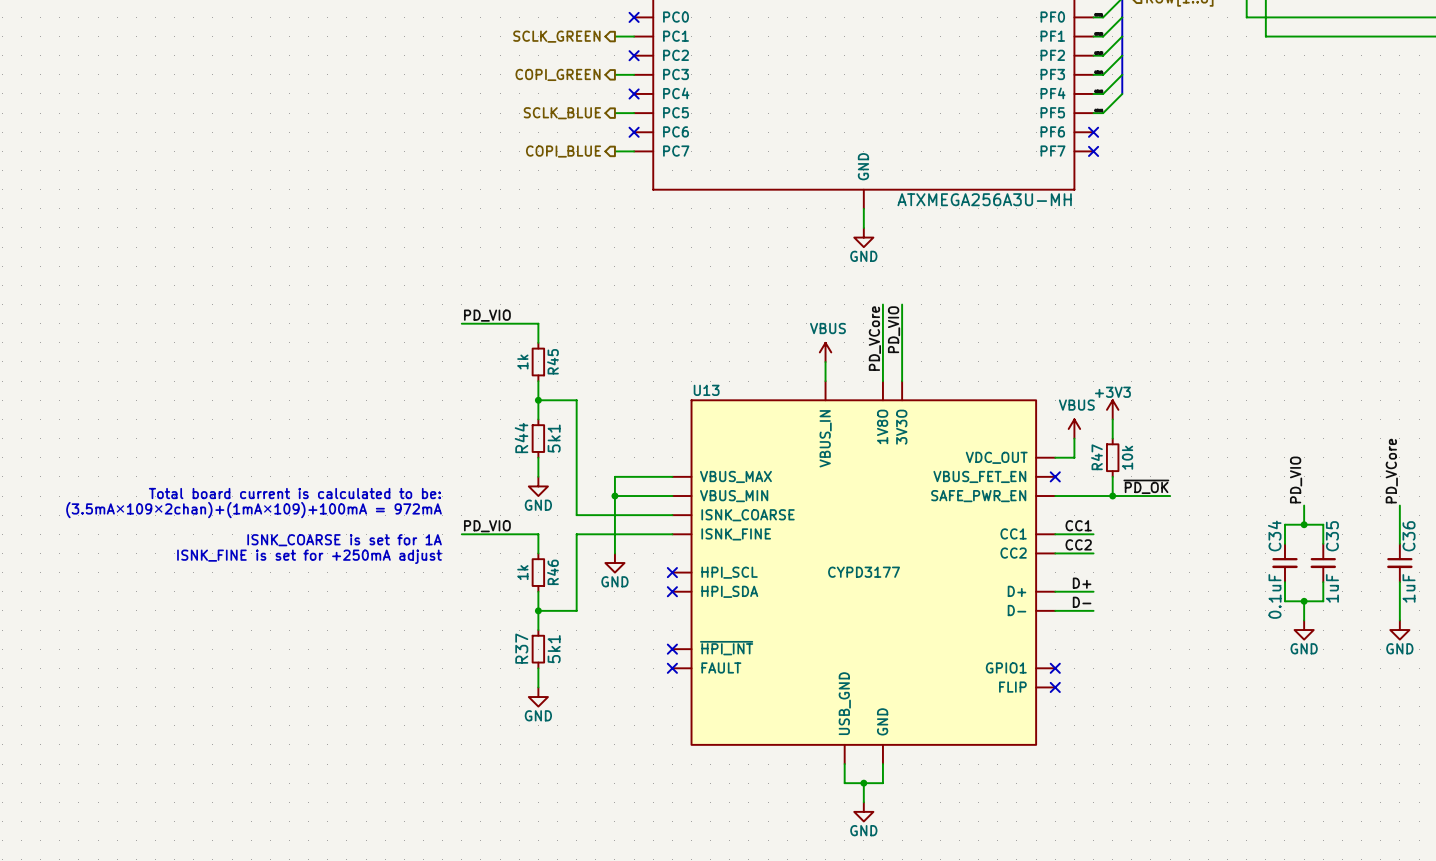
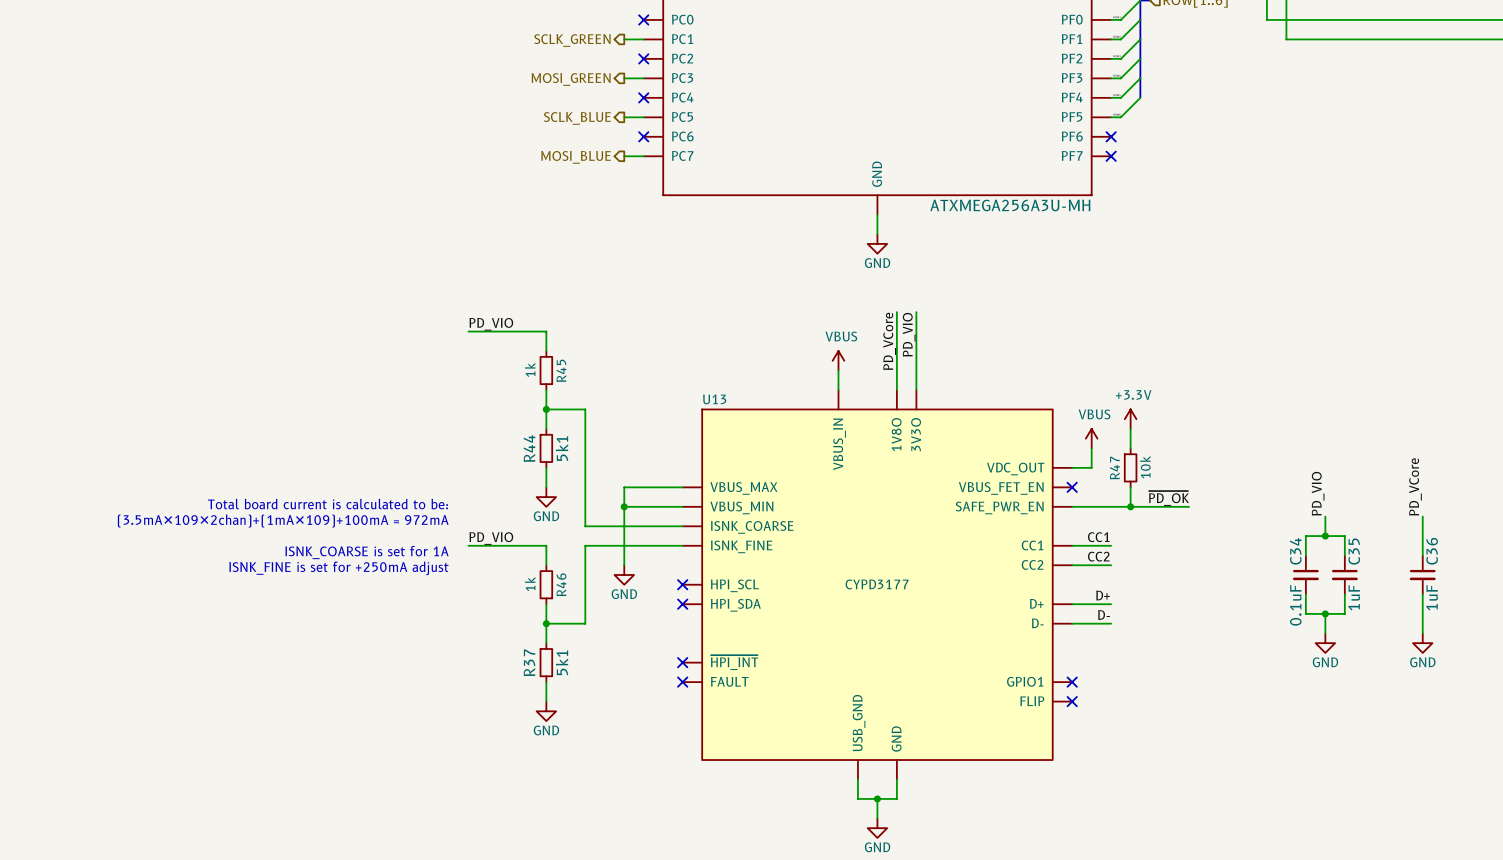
hierarchical label: COPI_GREEN (558, 74) -> MOSI_GREEN (571, 79)
hierarchical label: COPI_BLUE (563, 151) -> MOSI_BLUE (576, 157)
power symbol: +3V3 (1112, 409) -> +3.3V (1130, 419)

